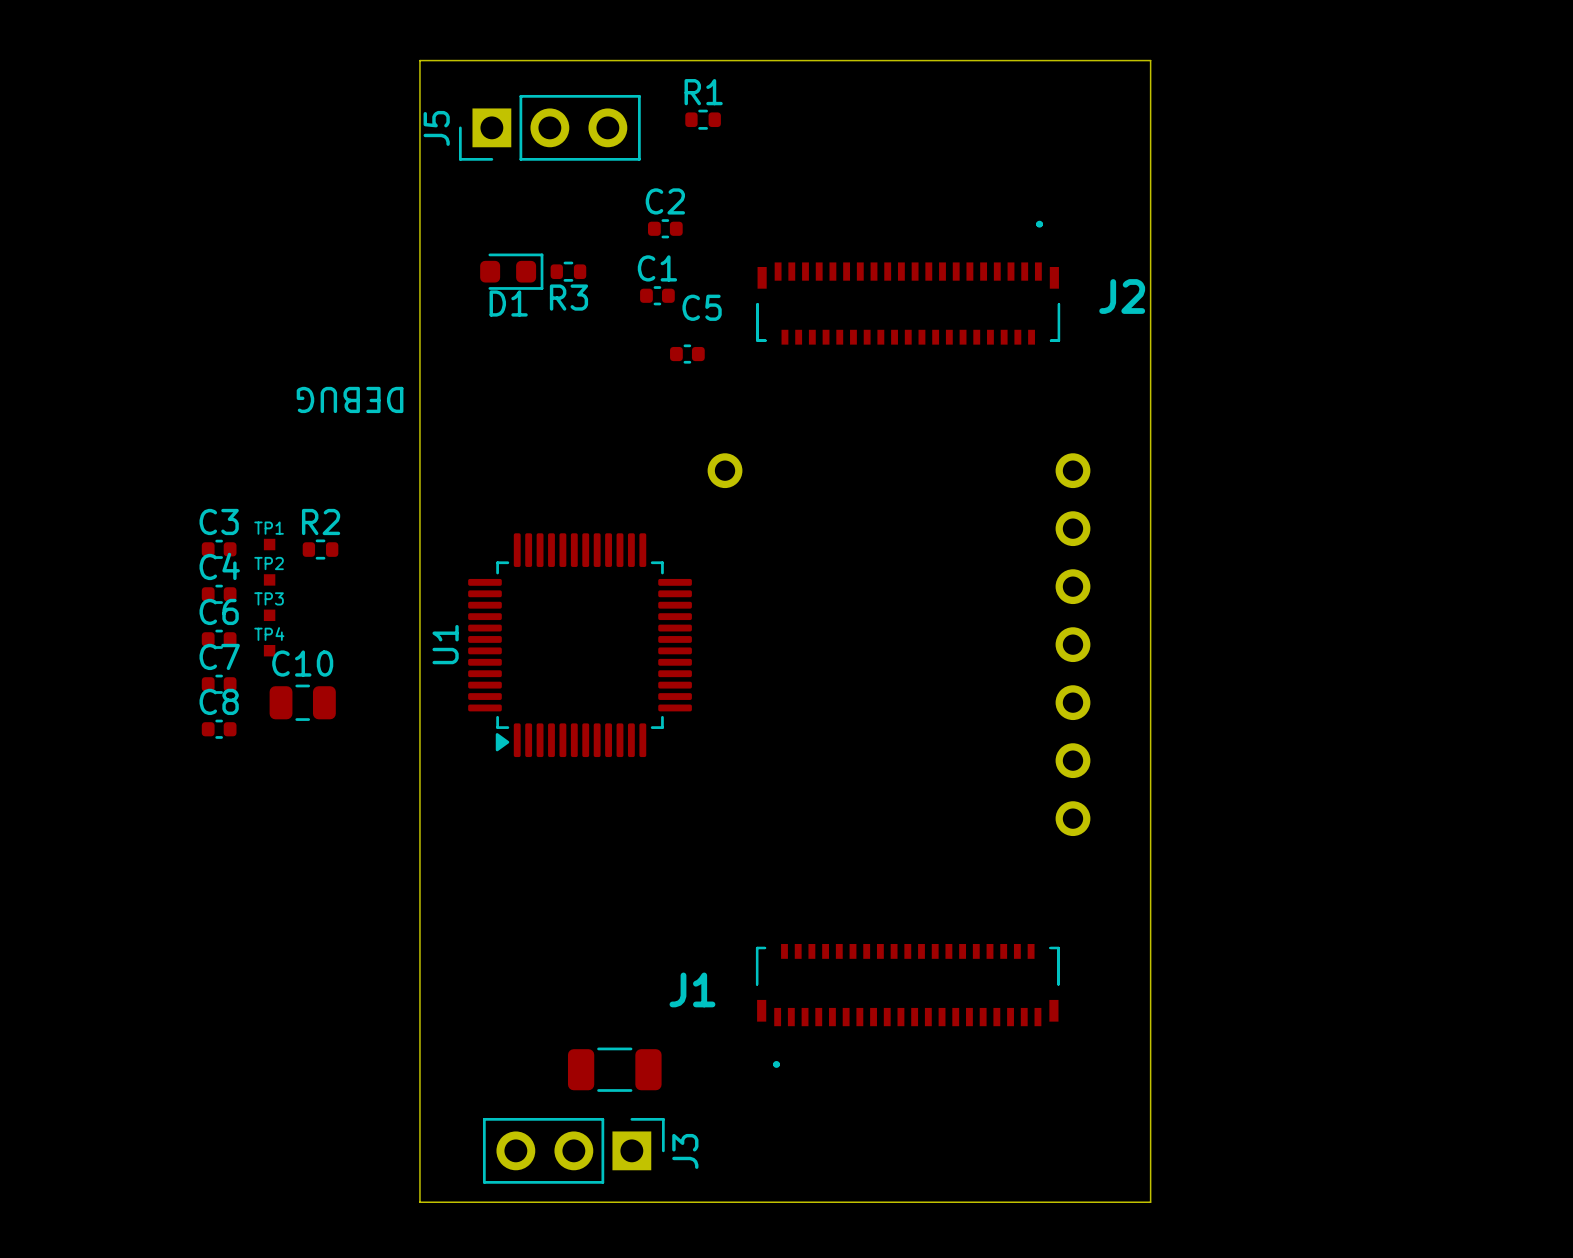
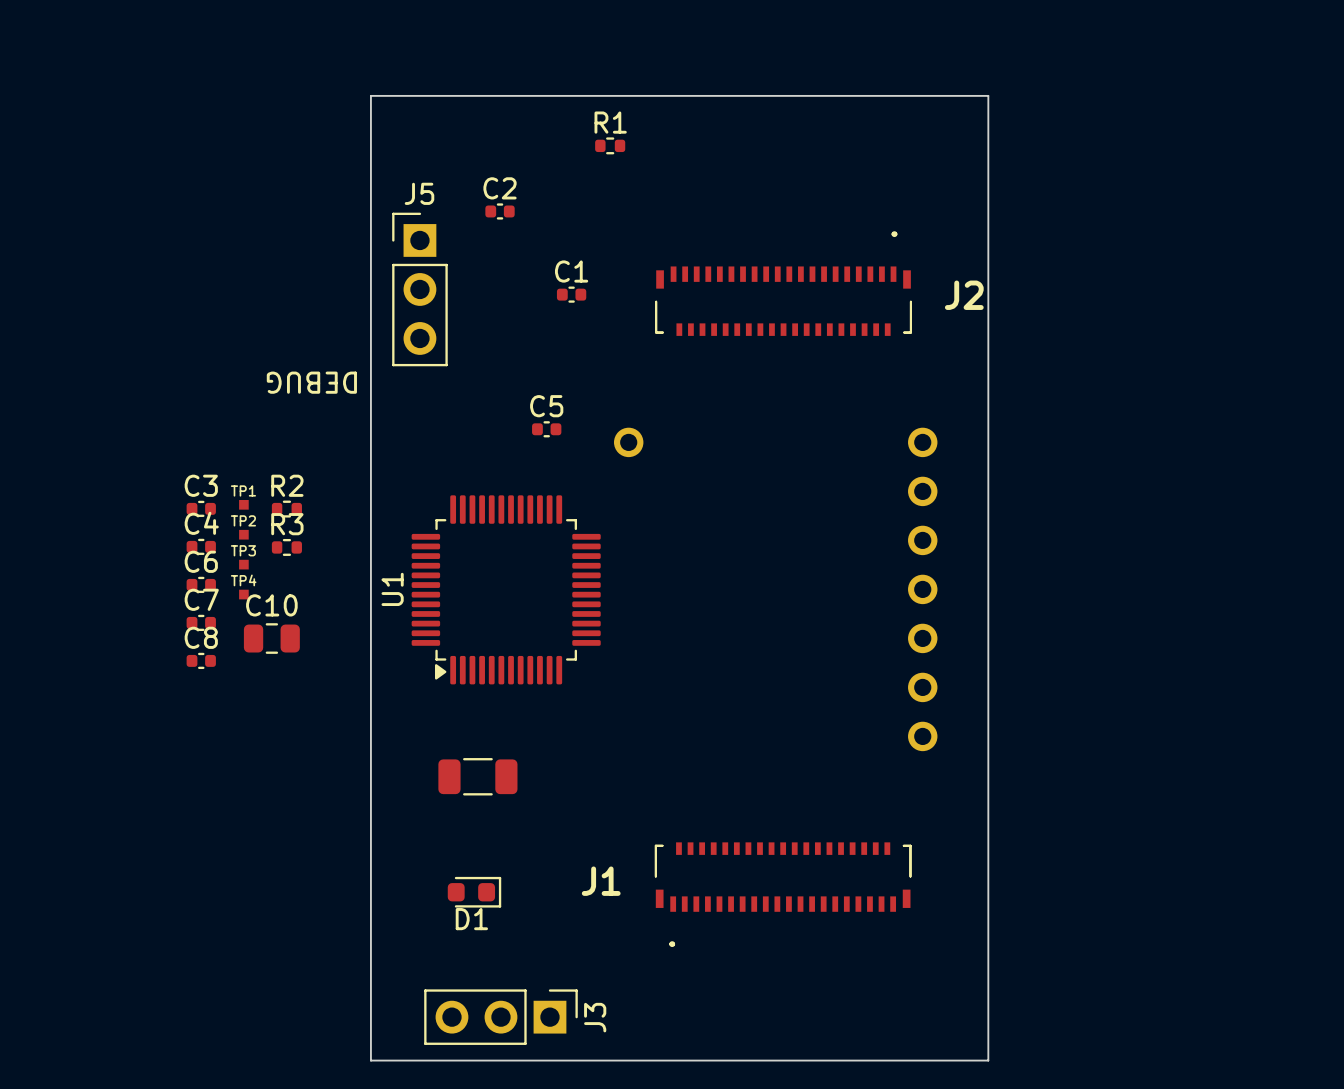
J5 rotation: 0° (549, 127) -> 90° clockwise (419, 289)
J5 position: (549, 127) -> (419, 289)
C2 position: (665, 228) -> (500, 211)
D1 position: (511, 271) -> (474, 892)
R3 position: (568, 271) -> (286, 547)
R3 name position: R3 (568, 297) -> R3 (287, 524)
C5 name position: C5 (702, 307) -> C5 (546, 406)
C5 position: (687, 354) -> (546, 429)
part position: (614, 1069) -> (477, 776)

